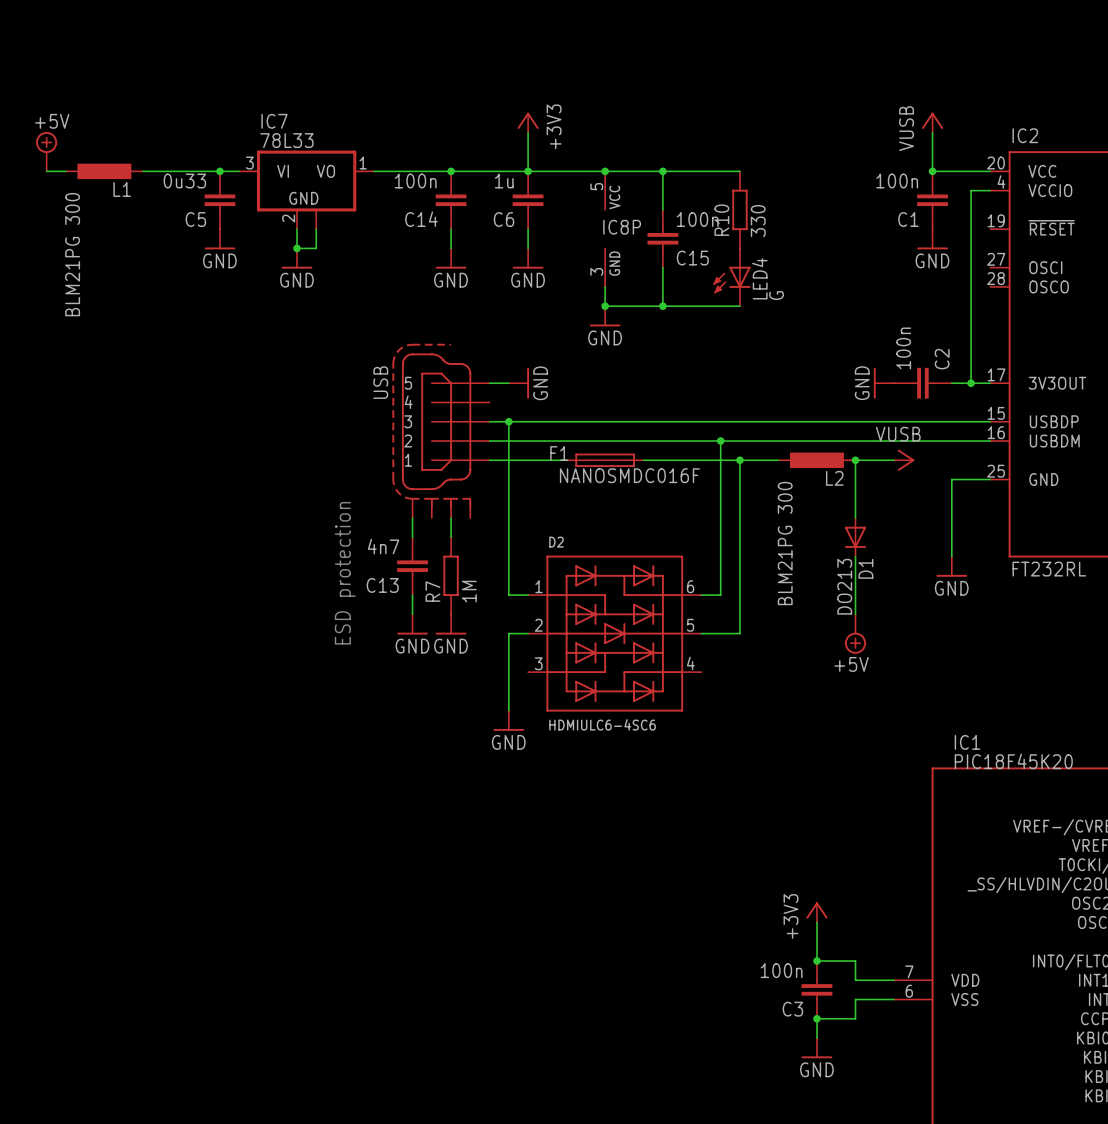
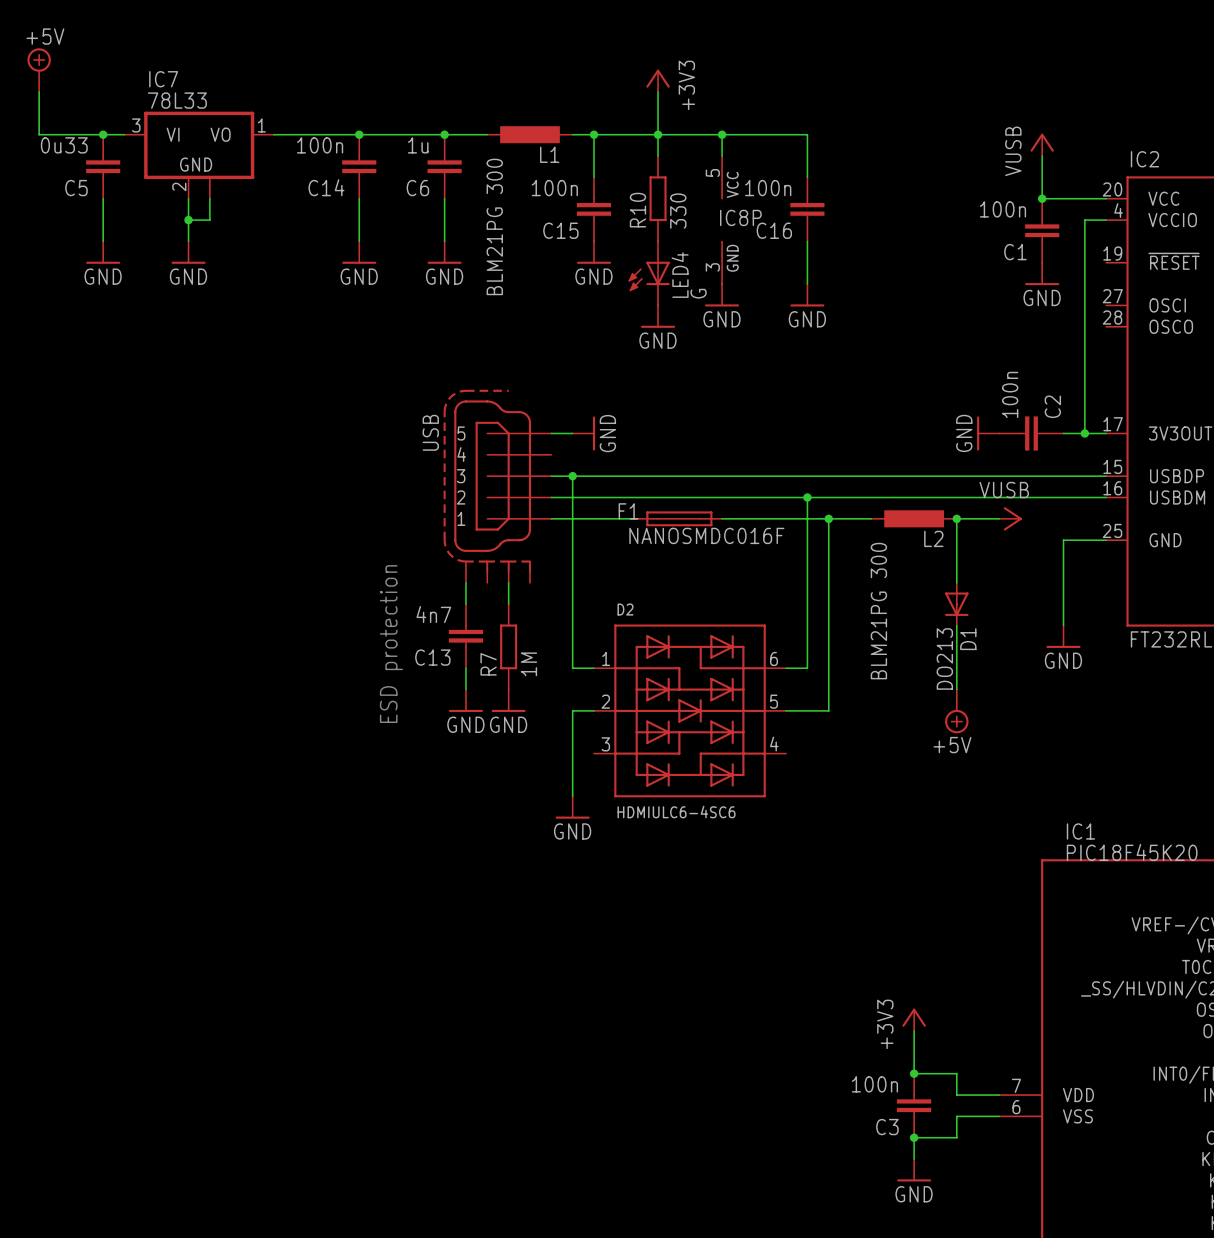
wire: none -> (39, 92) (39, 134) (124, 134)
wire: none -> (658, 92) (658, 156)
junction: none -> (103, 134)
wire: none -> (273, 134) (487, 134)
junction: none -> (359, 134)
junction: none -> (444, 134)
wire: none -> (572, 134) (807, 134) (807, 177)
junction: none -> (594, 134)
junction: none -> (658, 134)
junction: none -> (722, 134)
power symbol position: +3V3 (528, 122) -> +3V3 (658, 80)
power symbol position: +5V (46, 151) -> +5V (39, 70)
wire: (46, 171) (65, 171) -> none
wire: none -> (103, 198) (103, 241)
L1 position: (104, 171) -> (529, 134)
wire: (142, 171) (239, 171) -> none
wire: none -> (188, 198) (188, 241)
wire: none -> (209, 198) (209, 220) (188, 220)
junction: (219, 171) -> none
wire: none -> (359, 198) (359, 241)
wire: (374, 171) (739, 171) -> none
wire: none -> (444, 198) (444, 241)
junction: (451, 171) -> none
junction: (528, 171) -> none
junction: (605, 171) -> none
wire: (662, 171) (662, 209) -> (807, 241) (807, 284)
junction: (662, 171) -> none
C16: none -> 100n (807, 209)
IC7 position: (306, 189) -> (199, 155)
junction: none -> (188, 220)
C5 position: (219, 200) -> (103, 166)
C14 position: (451, 200) -> (359, 166)
C6 position: (528, 200) -> (444, 166)
R10 position: (739, 209) -> (658, 198)
C15 value position: 100n (697, 219) -> 100n (554, 188)
power symbol: none -> GND (103, 252)
power symbol: none -> GND (188, 252)
power symbol: none -> GND (444, 252)
power symbol: none -> GND (594, 252)
wire: (296, 229) (296, 248) (316, 248) (316, 229) -> none
wire: (451, 229) (451, 248) -> none
wire: (528, 229) (528, 248) -> (722, 134) (722, 156)
IC8P position: (605, 229) -> (722, 220)
C15 position: (662, 238) -> (594, 209)
power symbol: GND (219, 239) -> none
junction: (296, 248) -> none
power symbol position: GND (296, 258) -> GND (359, 252)
power symbol: GND (451, 258) -> none
power symbol: GND (528, 258) -> none
power symbol: none -> GND (722, 295)
C15 name position: C15 (692, 258) -> C15 (560, 230)
power symbol: none -> GND (807, 295)
wire: (662, 267) (662, 306) -> none
power symbol: none -> GND (658, 316)
LED4 position: (731, 277) -> (649, 273)
wire: (605, 286) (605, 306) (739, 306) -> none
junction: (605, 306) -> none
junction: (662, 306) -> none
power symbol: GND (605, 316) -> none

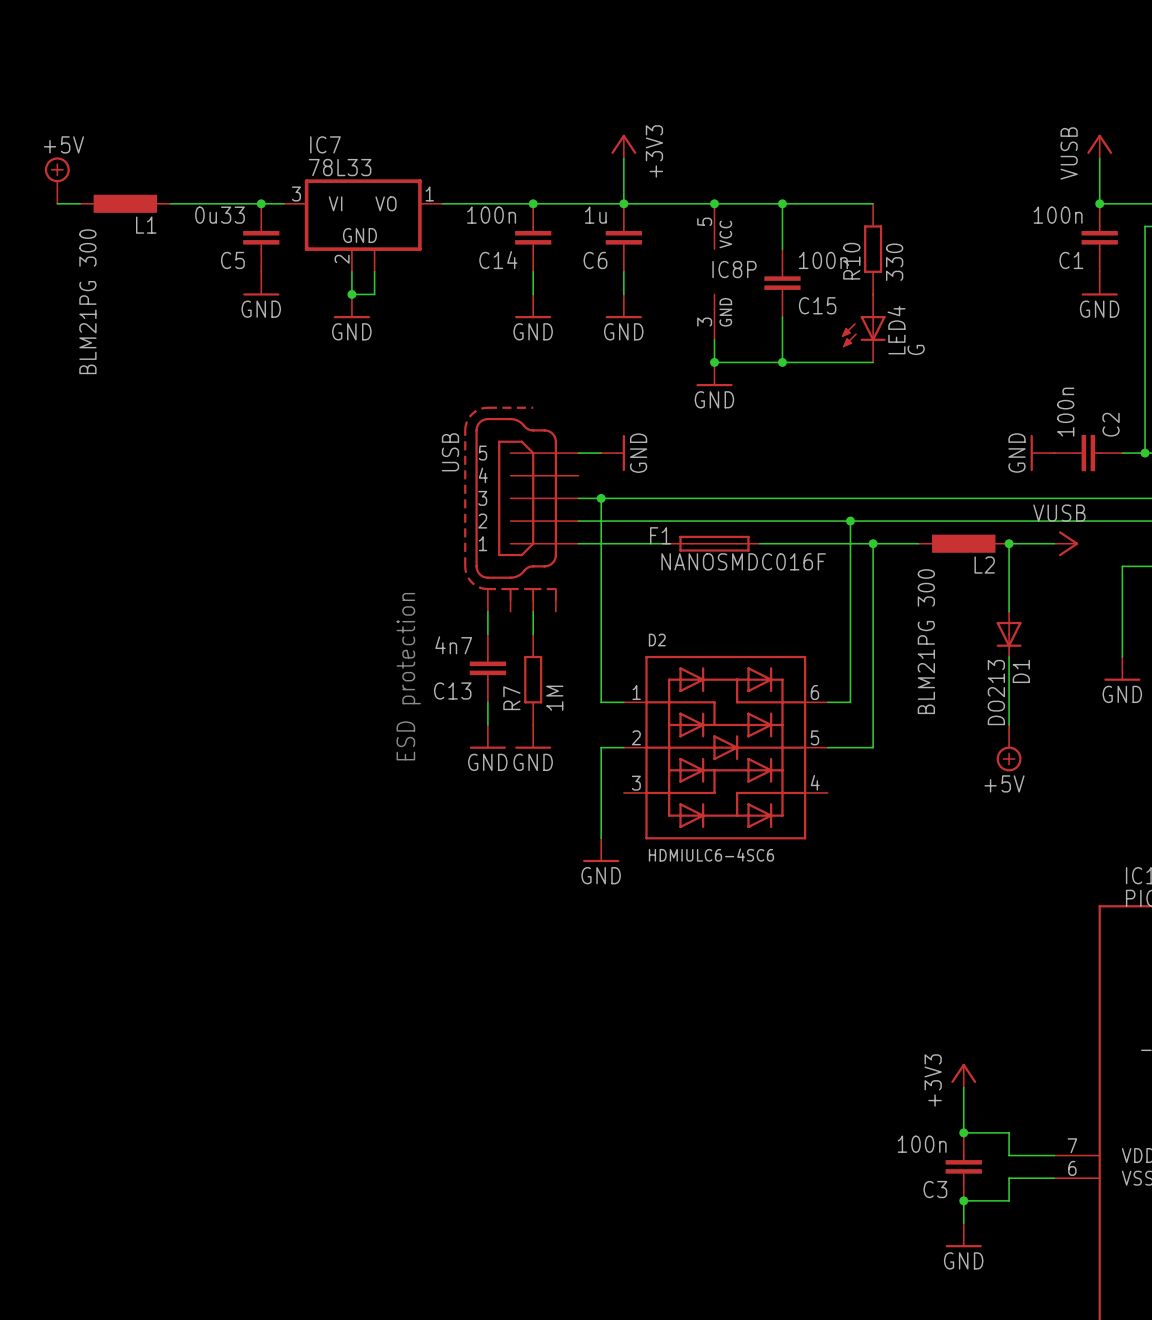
power symbol position: +5V (39, 70) -> +5V (57, 180)
power symbol position: +3V3 (658, 80) -> +3V3 (623, 146)
wire: (39, 92) (39, 134) (124, 134) -> none
wire: (658, 92) (658, 156) -> none
junction: (103, 134) -> none
wire: (273, 134) (487, 134) -> none
junction: (359, 134) -> none
junction: (444, 134) -> none
L1 position: (529, 134) -> (125, 203)
wire: (572, 134) (807, 134) (807, 177) -> none
junction: (594, 134) -> none
junction: (658, 134) -> none
wire: (722, 134) (722, 156) -> (623, 271) (623, 294)
junction: (722, 134) -> none
IC7 position: (199, 155) -> (363, 225)
C5 position: (103, 166) -> (261, 237)
C14 position: (359, 166) -> (533, 237)
C6 position: (444, 166) -> (623, 237)
C15 value position: 100n (554, 188) -> 100n (823, 260)
wire: none -> (57, 203) (80, 203)
wire: (103, 198) (103, 241) -> none
wire: none -> (170, 203) (283, 203)
wire: (188, 198) (188, 241) -> none
wire: (209, 198) (209, 220) (188, 220) -> none
junction: none -> (261, 203)
wire: (359, 198) (359, 241) -> none
wire: none -> (442, 203) (873, 203)
wire: (444, 198) (444, 241) -> none
junction: none -> (533, 203)
junction: none -> (623, 203)
R10 position: (658, 198) -> (873, 249)
junction: none -> (714, 203)
junction: none -> (782, 203)
C15 position: (594, 209) -> (782, 283)
C16: 100n (807, 209) -> none
junction: (188, 220) -> none
IC8P position: (722, 220) -> (714, 271)
C15 name position: C15 (560, 230) -> C15 (817, 305)
wire: (807, 241) (807, 284) -> (782, 203) (782, 249)
power symbol: GND (103, 252) -> none
power symbol: GND (188, 252) -> none
power symbol position: GND (359, 252) -> GND (351, 306)
power symbol: GND (444, 252) -> none
power symbol: GND (594, 252) -> none
wire: none -> (351, 271) (351, 294) (374, 294) (374, 271)
wire: none -> (533, 271) (533, 294)
power symbol: none -> GND (261, 283)
LED4 position: (649, 273) -> (863, 328)
junction: none -> (351, 294)
power symbol: none -> GND (533, 306)
power symbol: none -> GND (623, 306)
power symbol: GND (722, 295) -> none
power symbol: GND (807, 295) -> none
wire: none -> (782, 317) (782, 362)
power symbol: GND (658, 316) -> none
wire: none -> (714, 339) (714, 362) (873, 362)
junction: none -> (714, 362)
junction: none -> (782, 362)
power symbol: none -> GND (714, 374)

